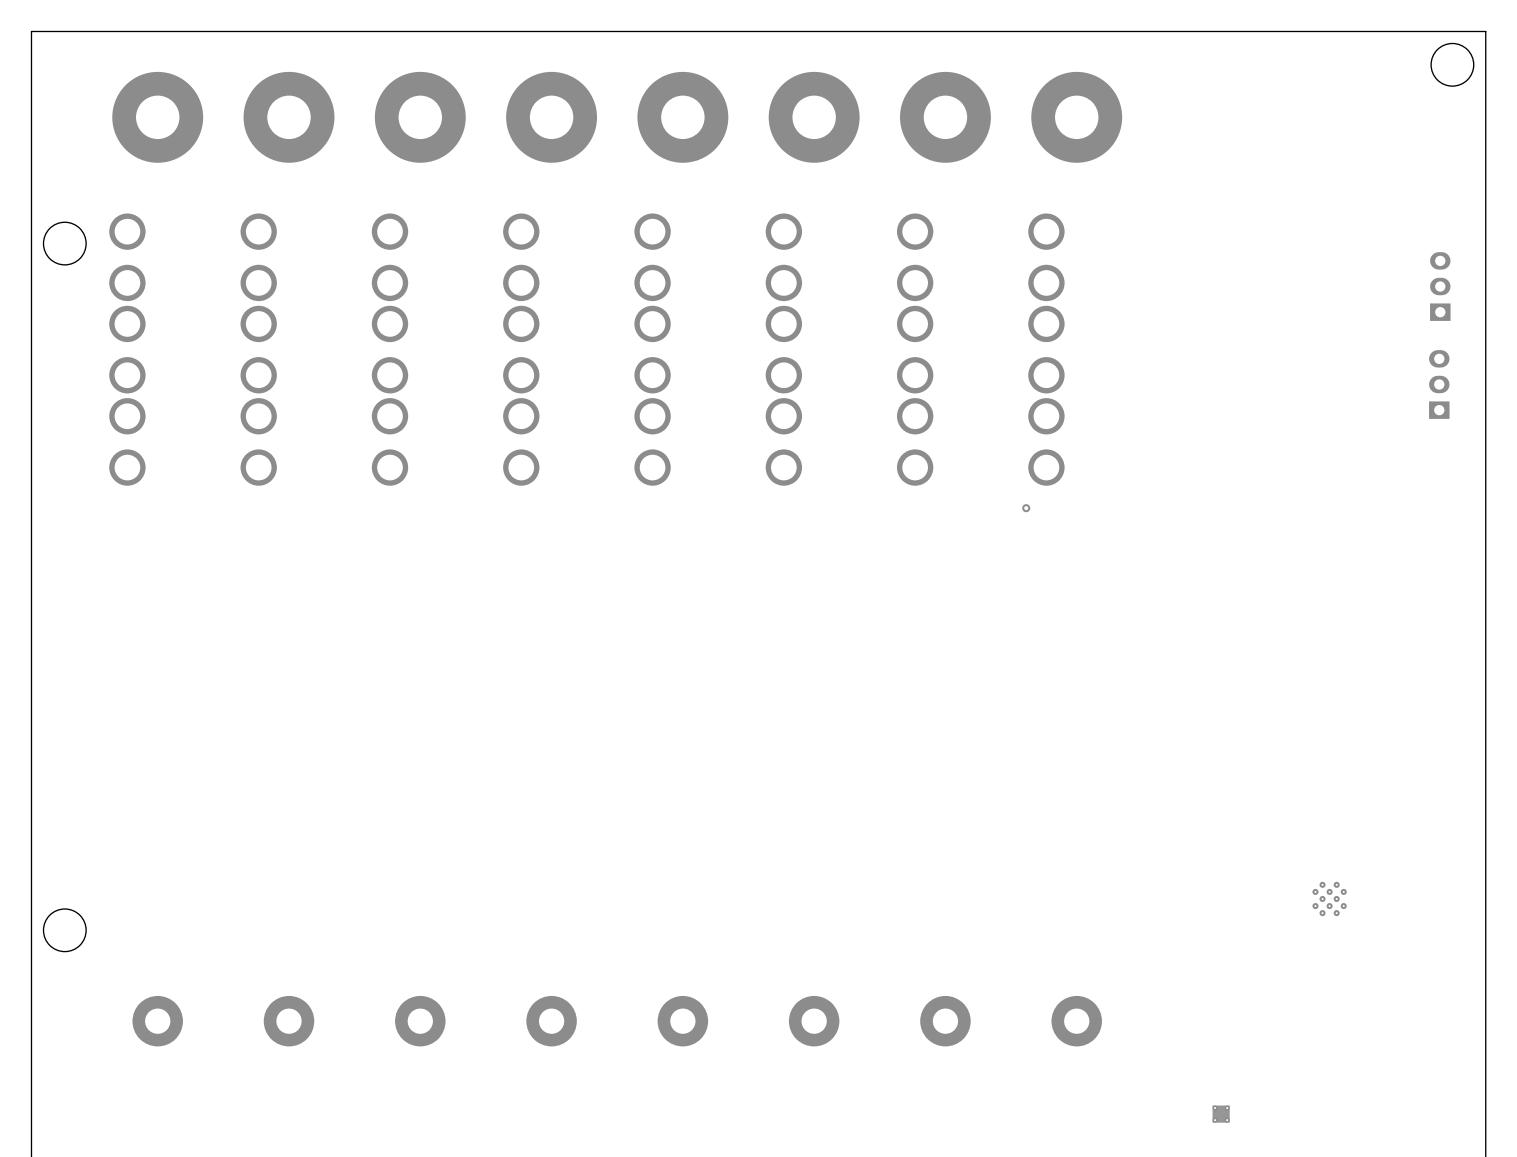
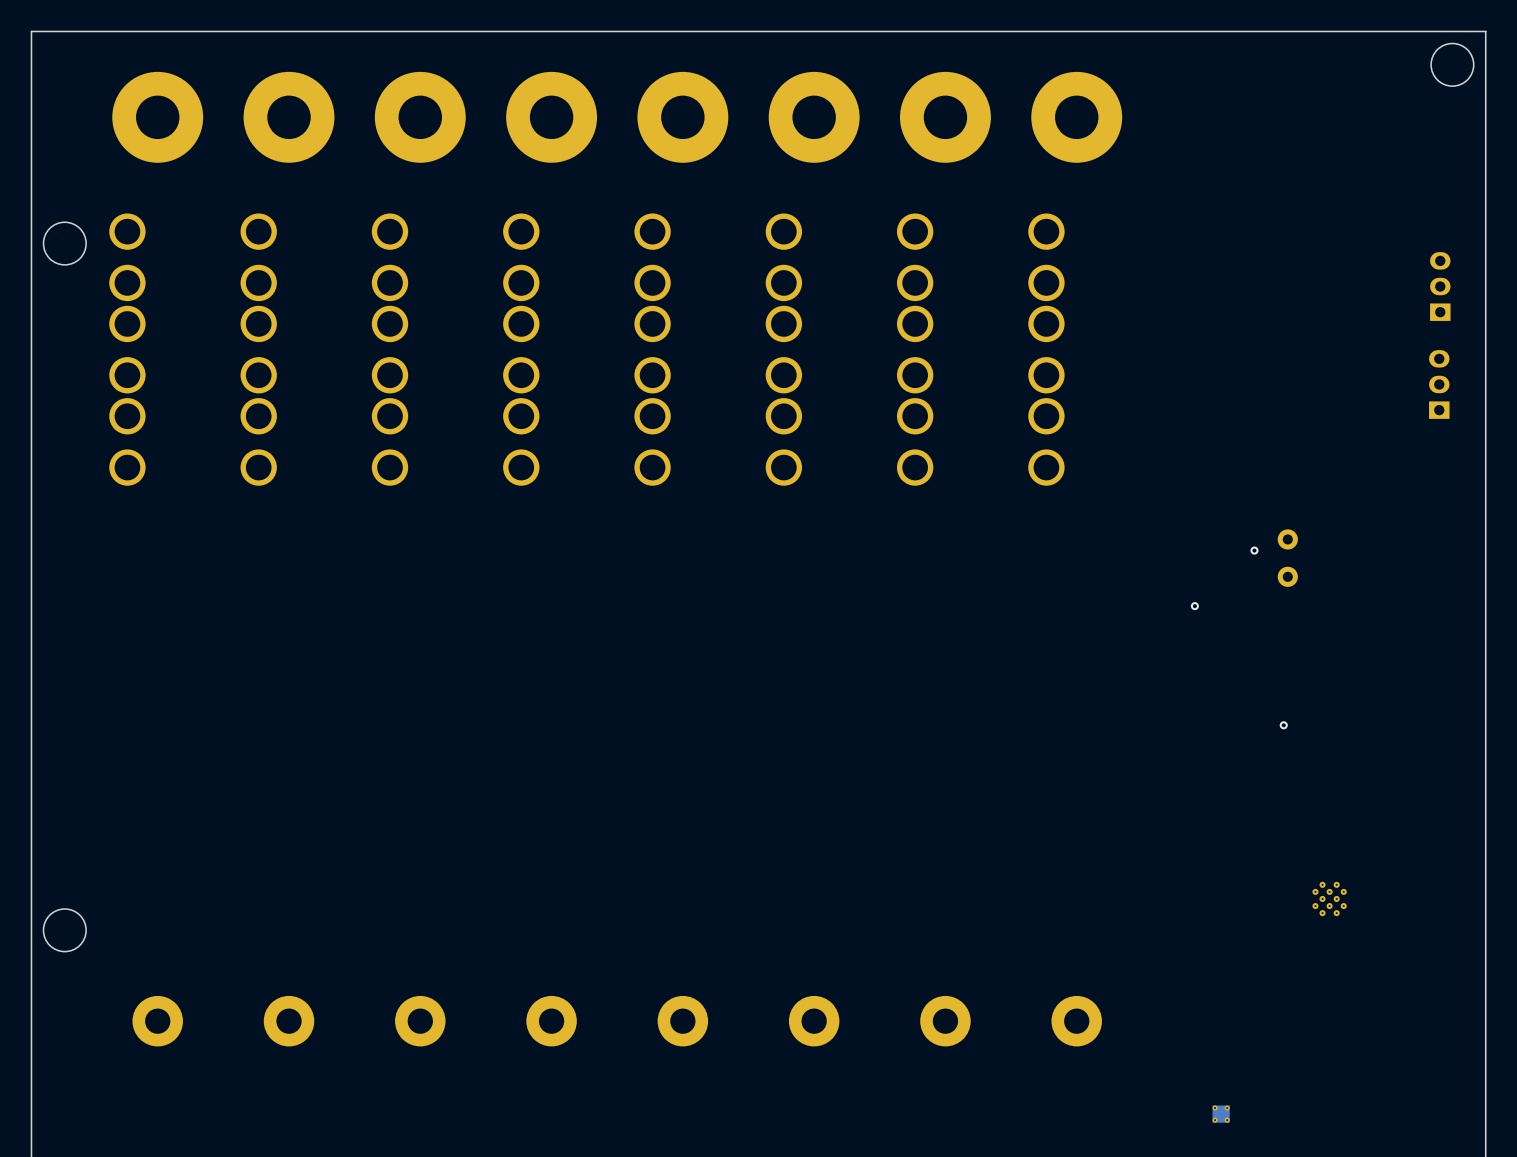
via: (1026, 508) -> none
part: none -> (1287, 539)
via: none -> (1254, 550)
part: none -> (1287, 576)
via: none -> (1194, 606)
via: none -> (1283, 725)

